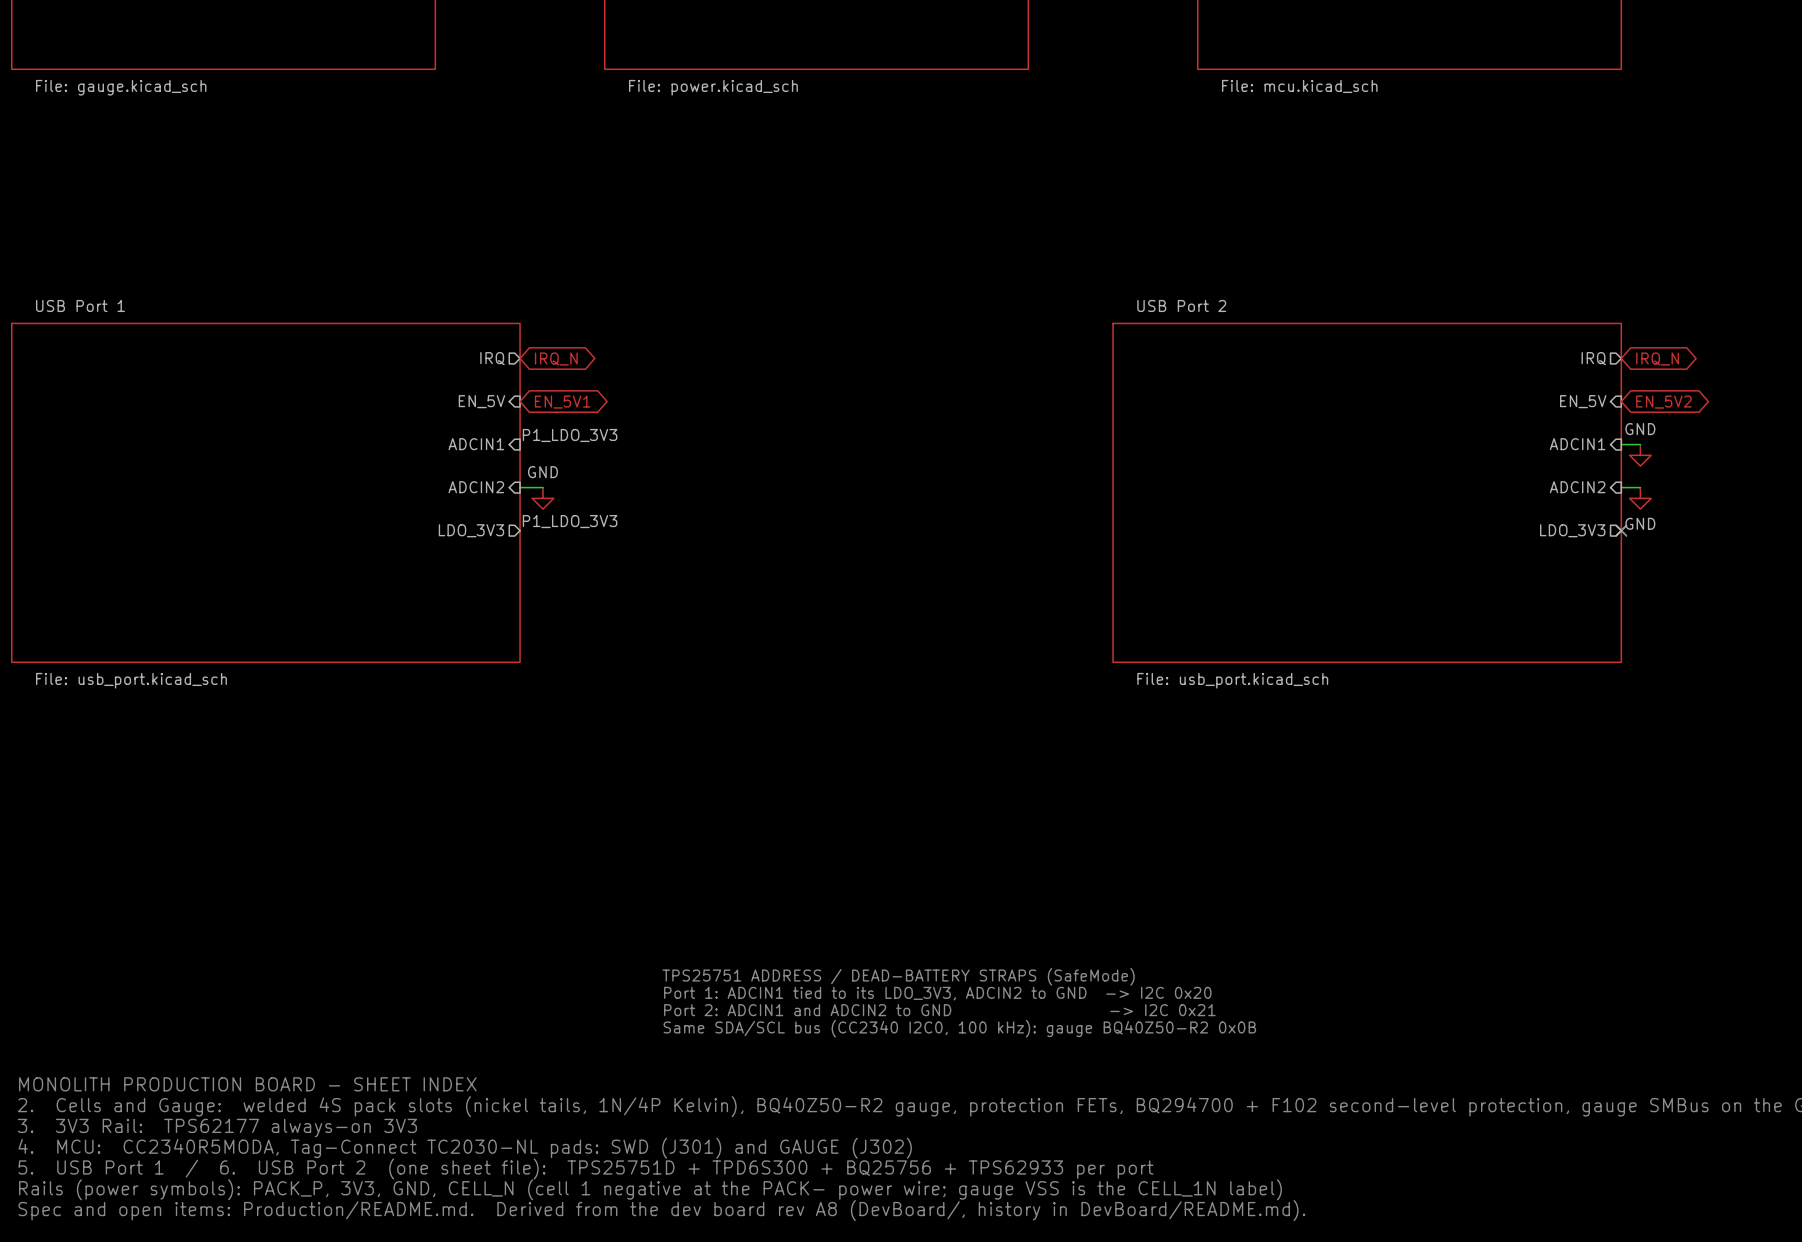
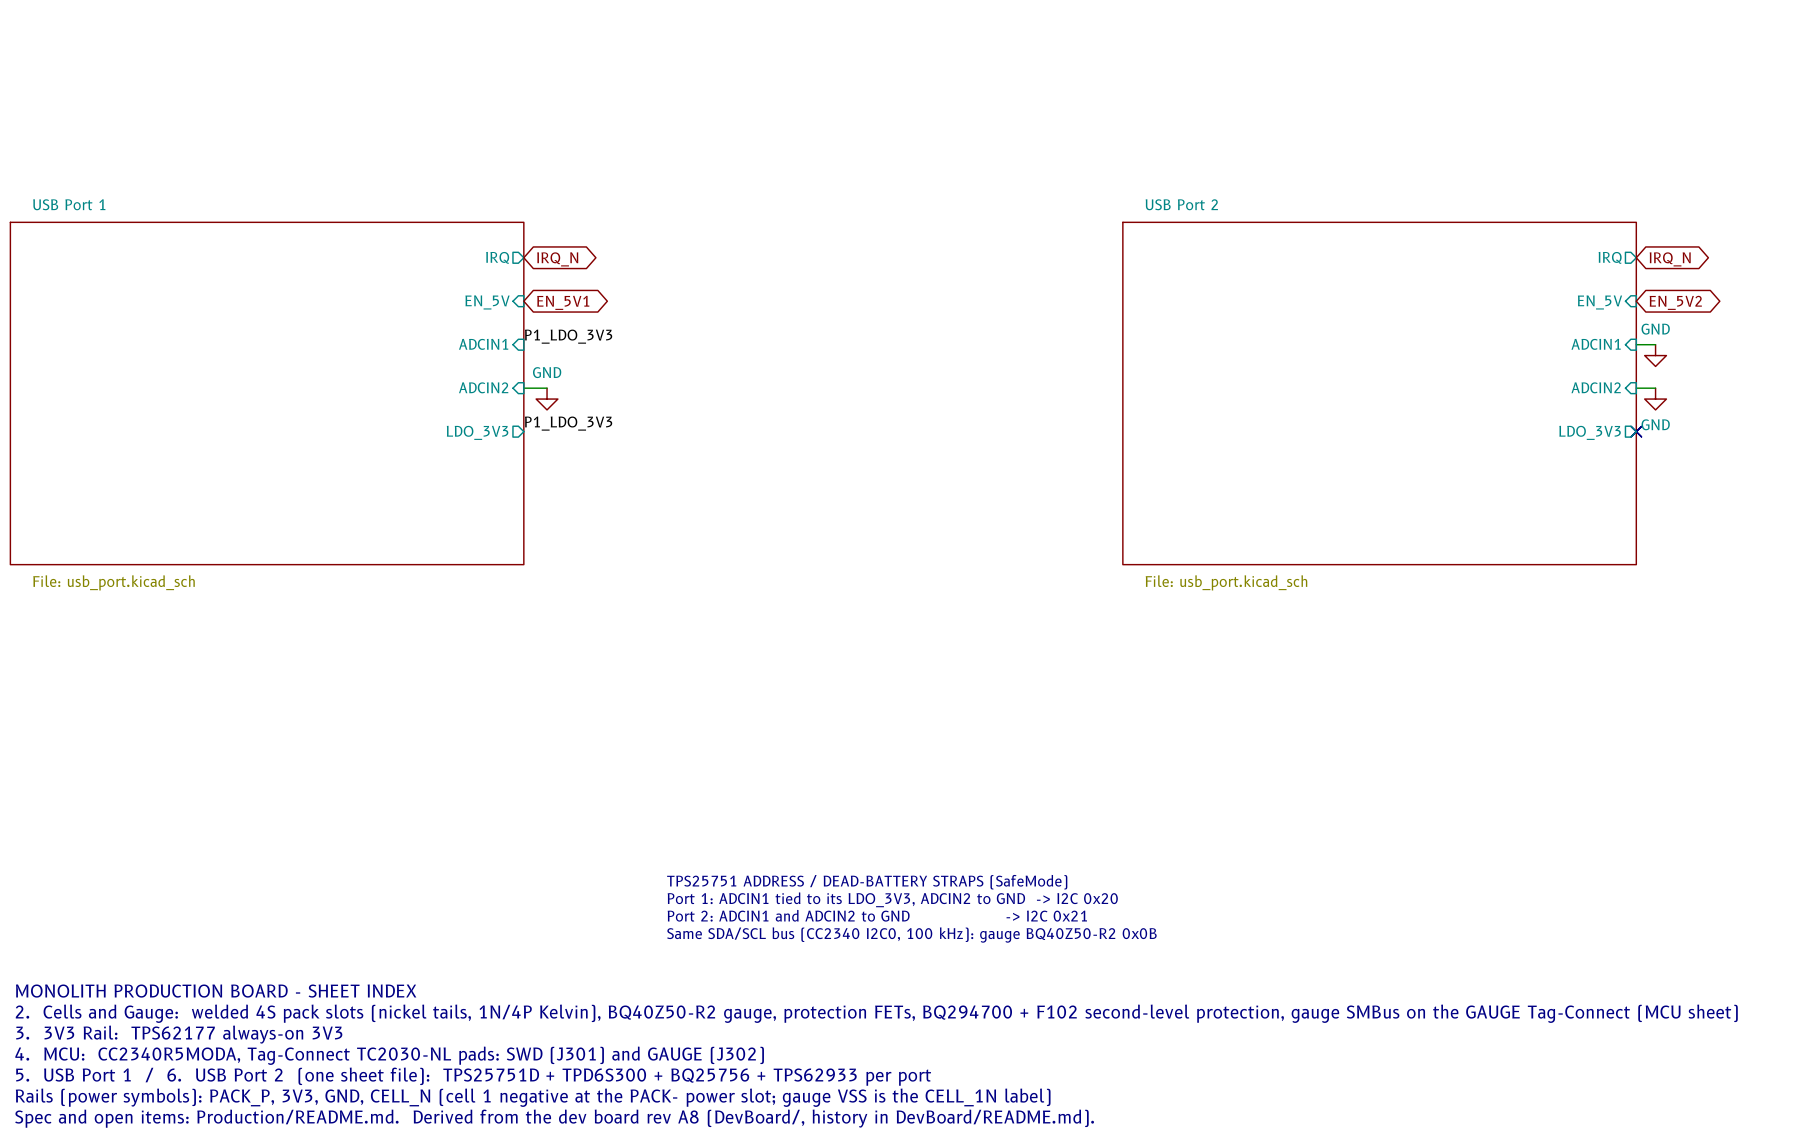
text: Rails (power symbols): PACK_P, 3V3, GND, CELL_N (cell 1 negative at the PACK- power wire; gauge VSS is the CELL_1N label) (650, 1189) -> Rails (power symbols): PACK_P, 3V3, GND, CELL_N (cell 1 negative at the PACK- power slot; gauge VSS is the CELL_1N label) (533, 1097)

